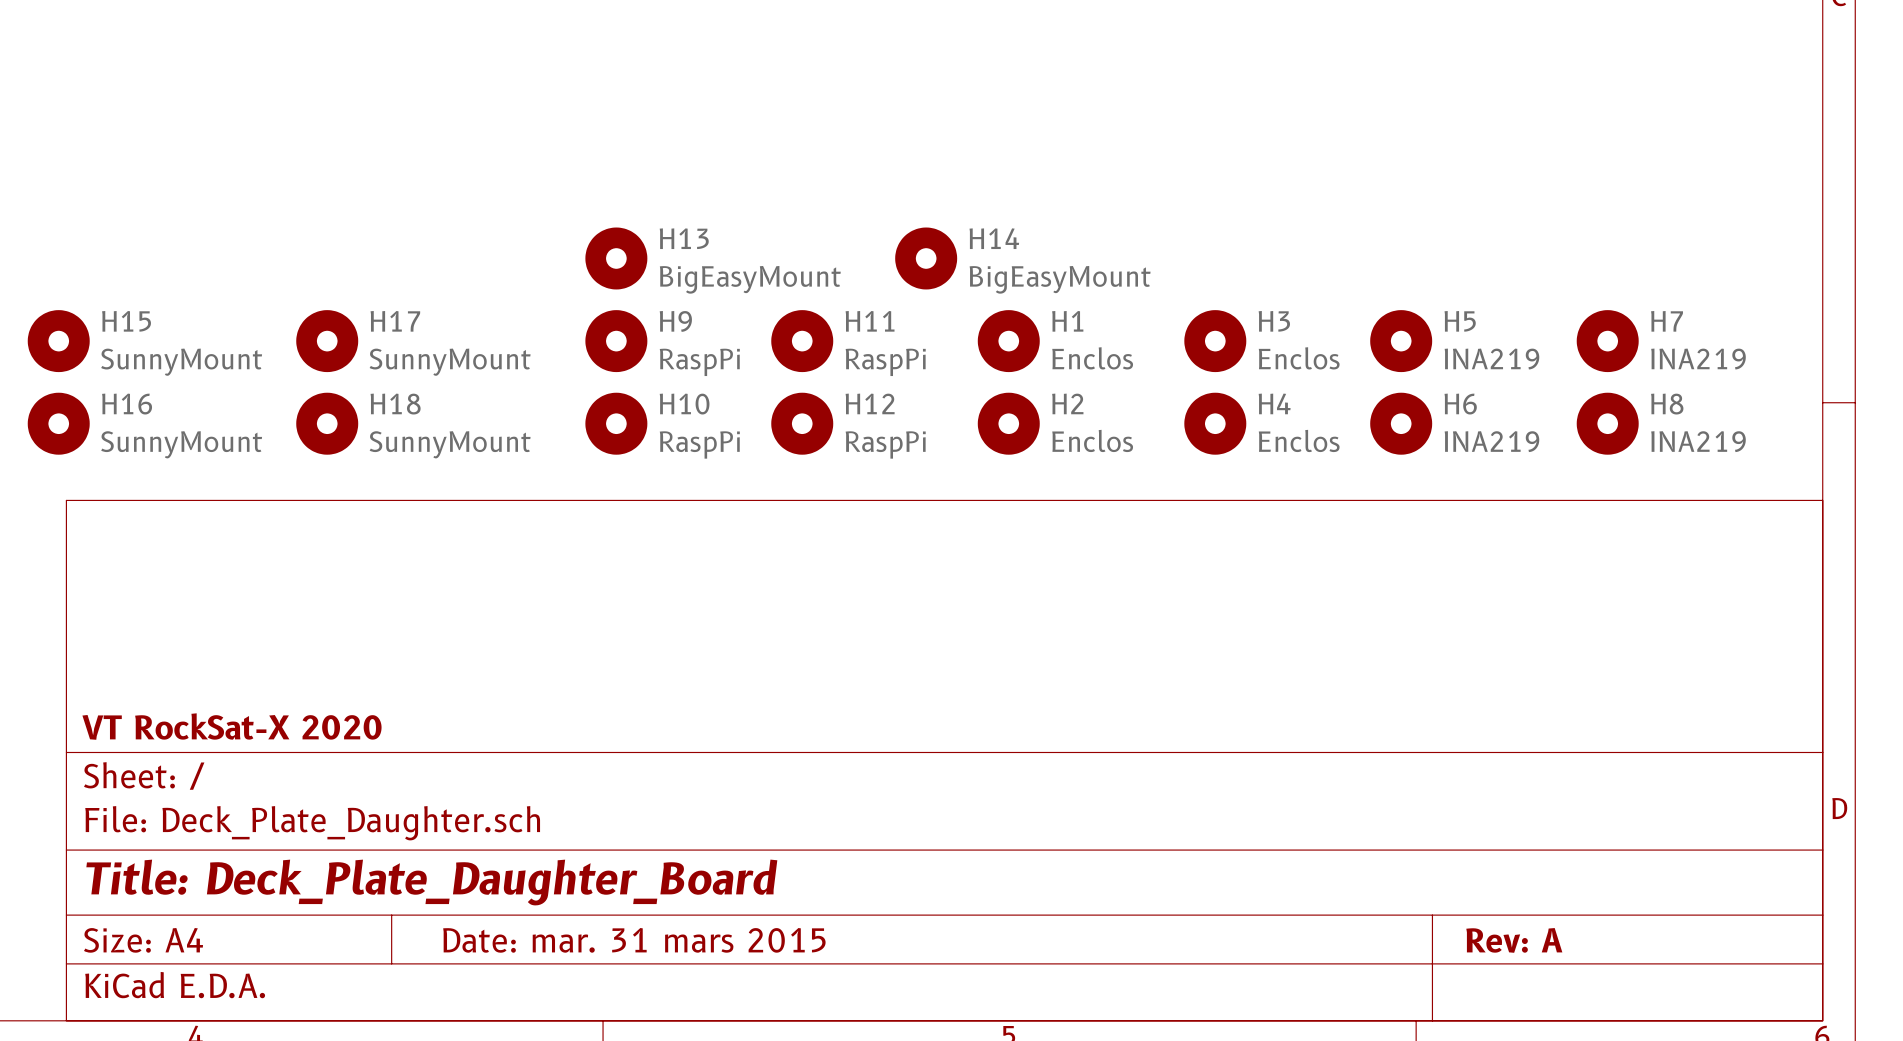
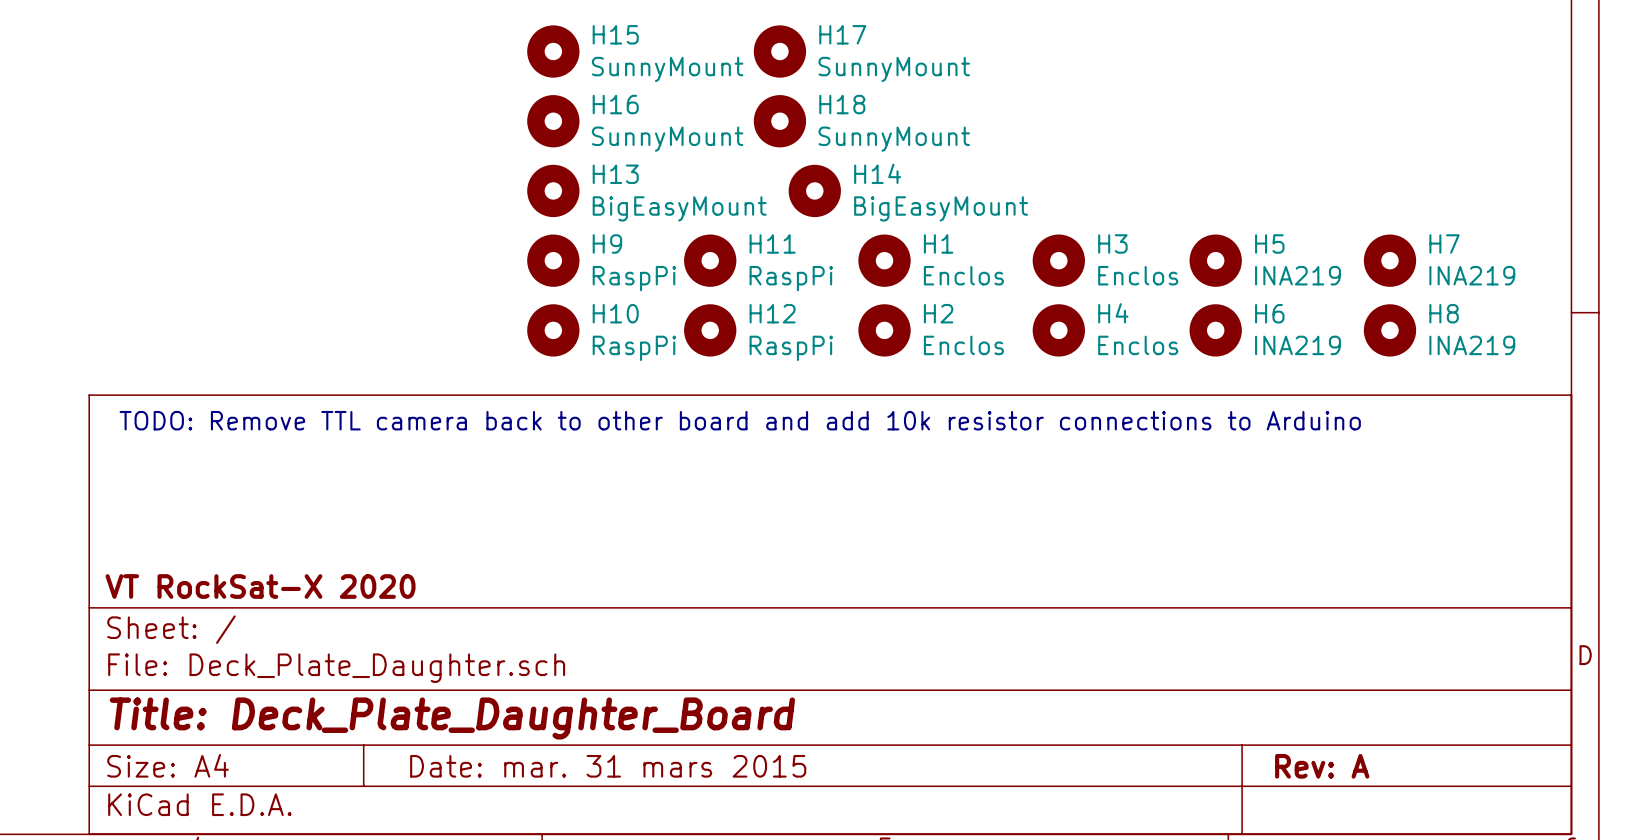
H15 position: (58, 341) -> (553, 51)
H17 position: (327, 341) -> (779, 51)
H16 position: (58, 423) -> (553, 121)
H18 position: (327, 423) -> (779, 121)
text: none -> TODO: Remove TTL camera back to other board and add 10k resistor connections to Arduino (740, 420)

